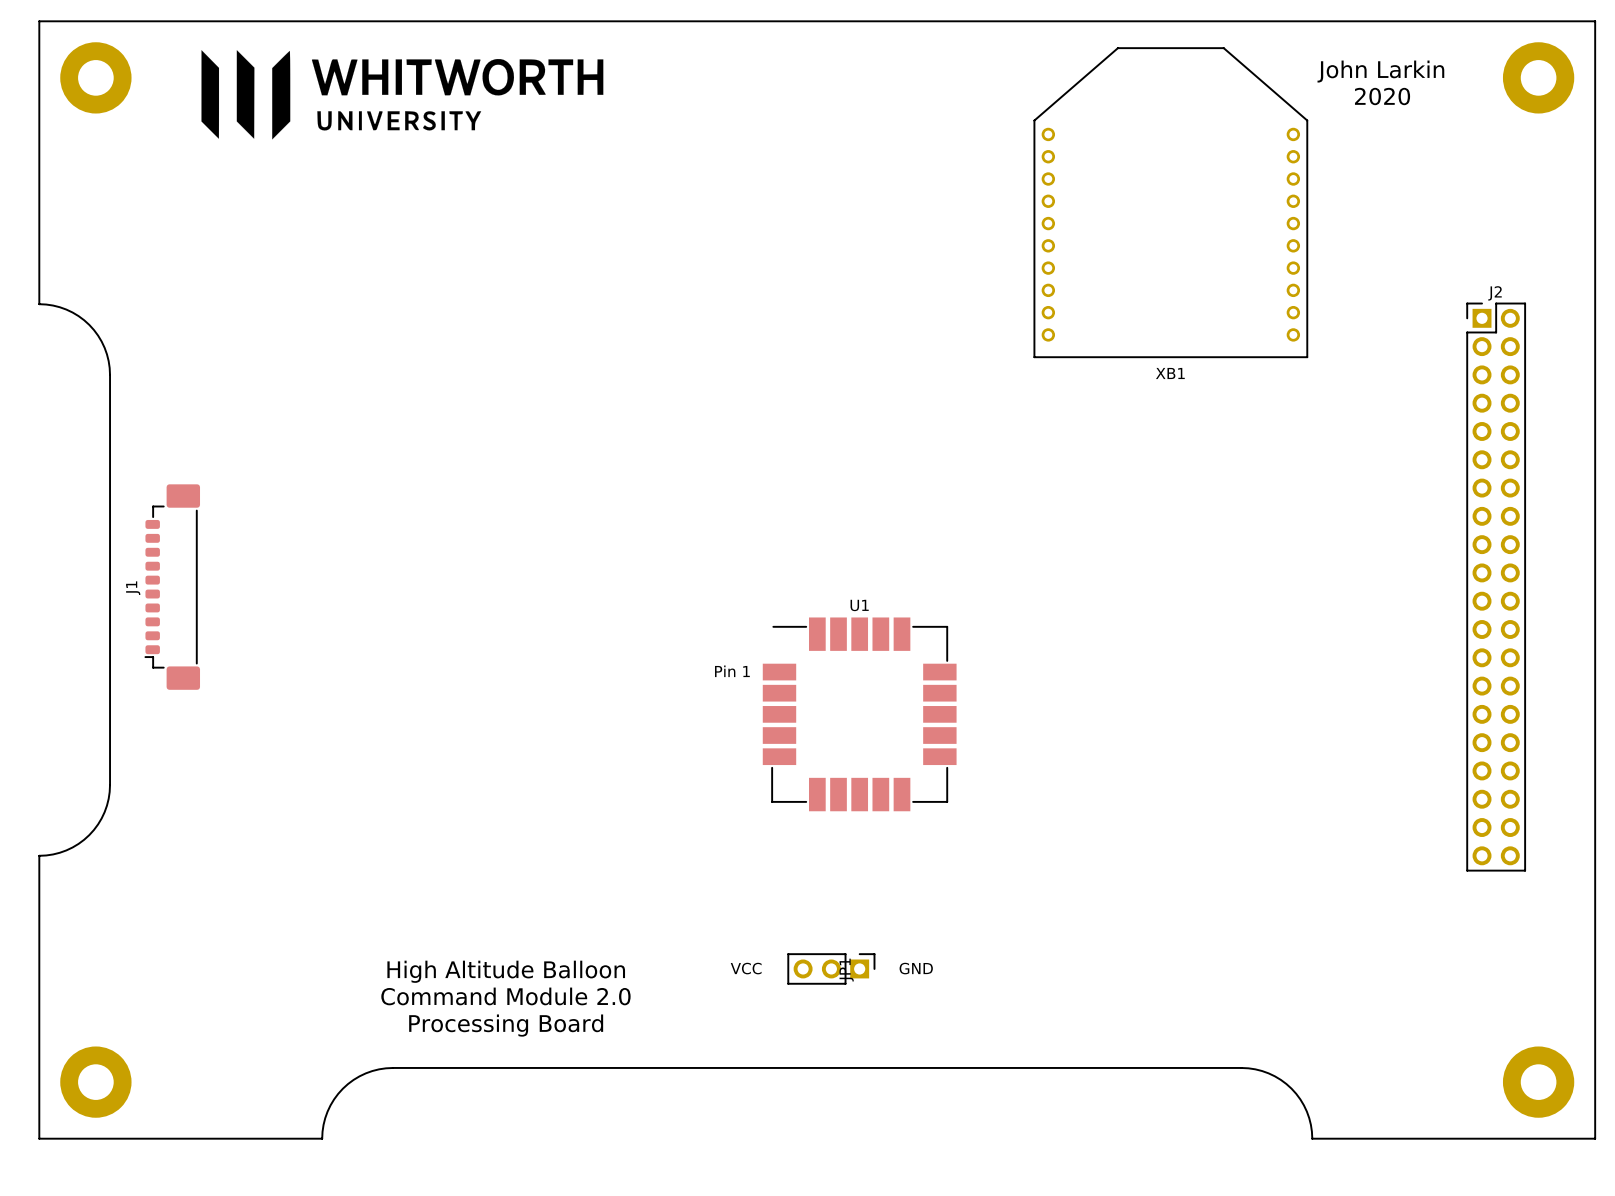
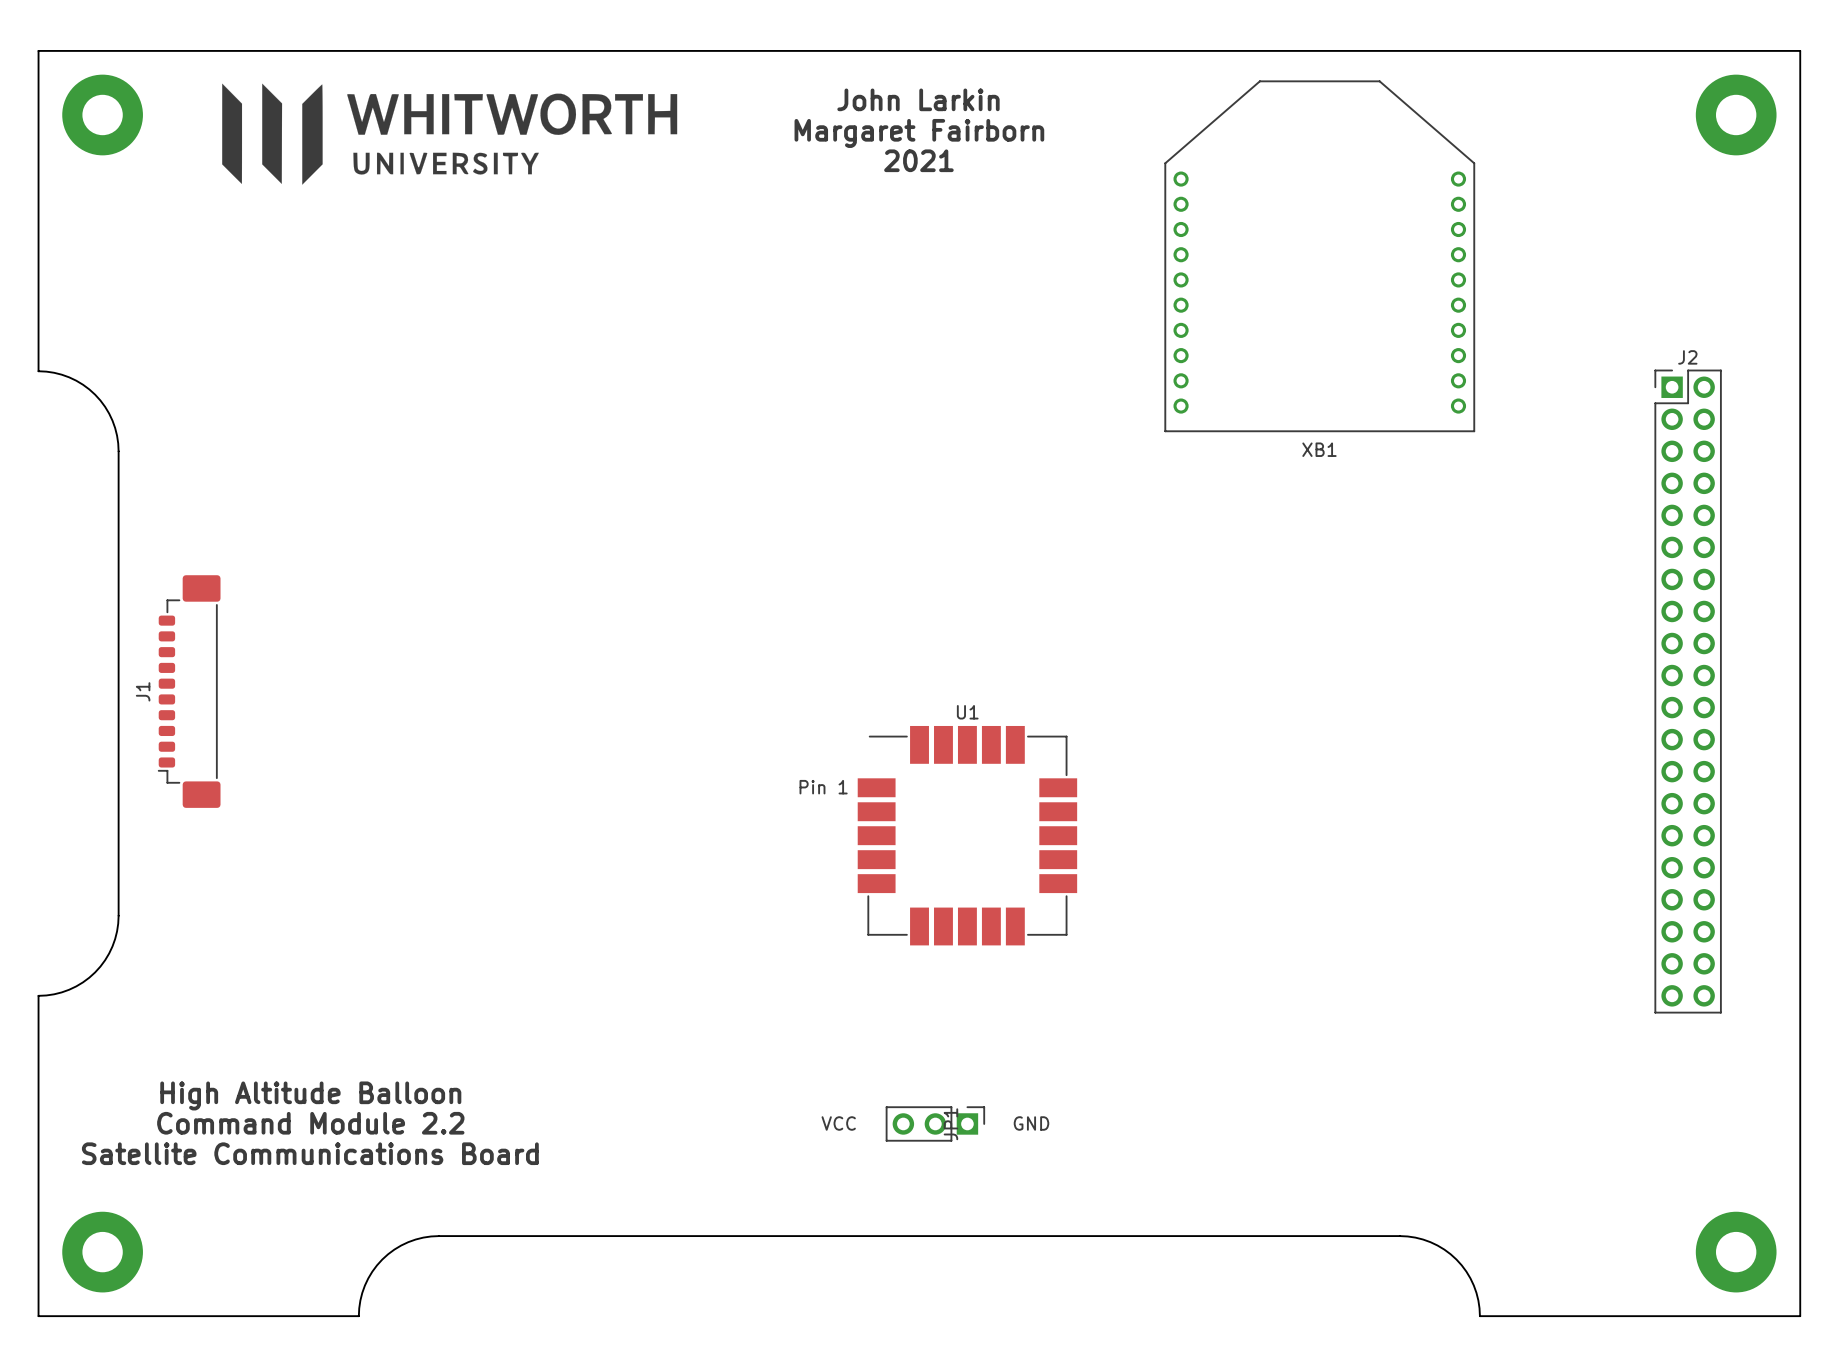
text: none -> John Larkin (918, 99)
text: John Larkin (1380, 71) -> none
text: none -> Margaret Fairborn (919, 133)
text: 2020 (1382, 96) -> none
text: none -> 2021 (918, 160)
text position: High Altitude Balloon (506, 971) -> High Altitude Balloon (310, 1095)
text: none -> Satellite Communications Board (310, 1153)
text: Command Module 2.0 (505, 996) -> Command Module 2.2 (310, 1123)
text: Processing Board (506, 1025) -> none

